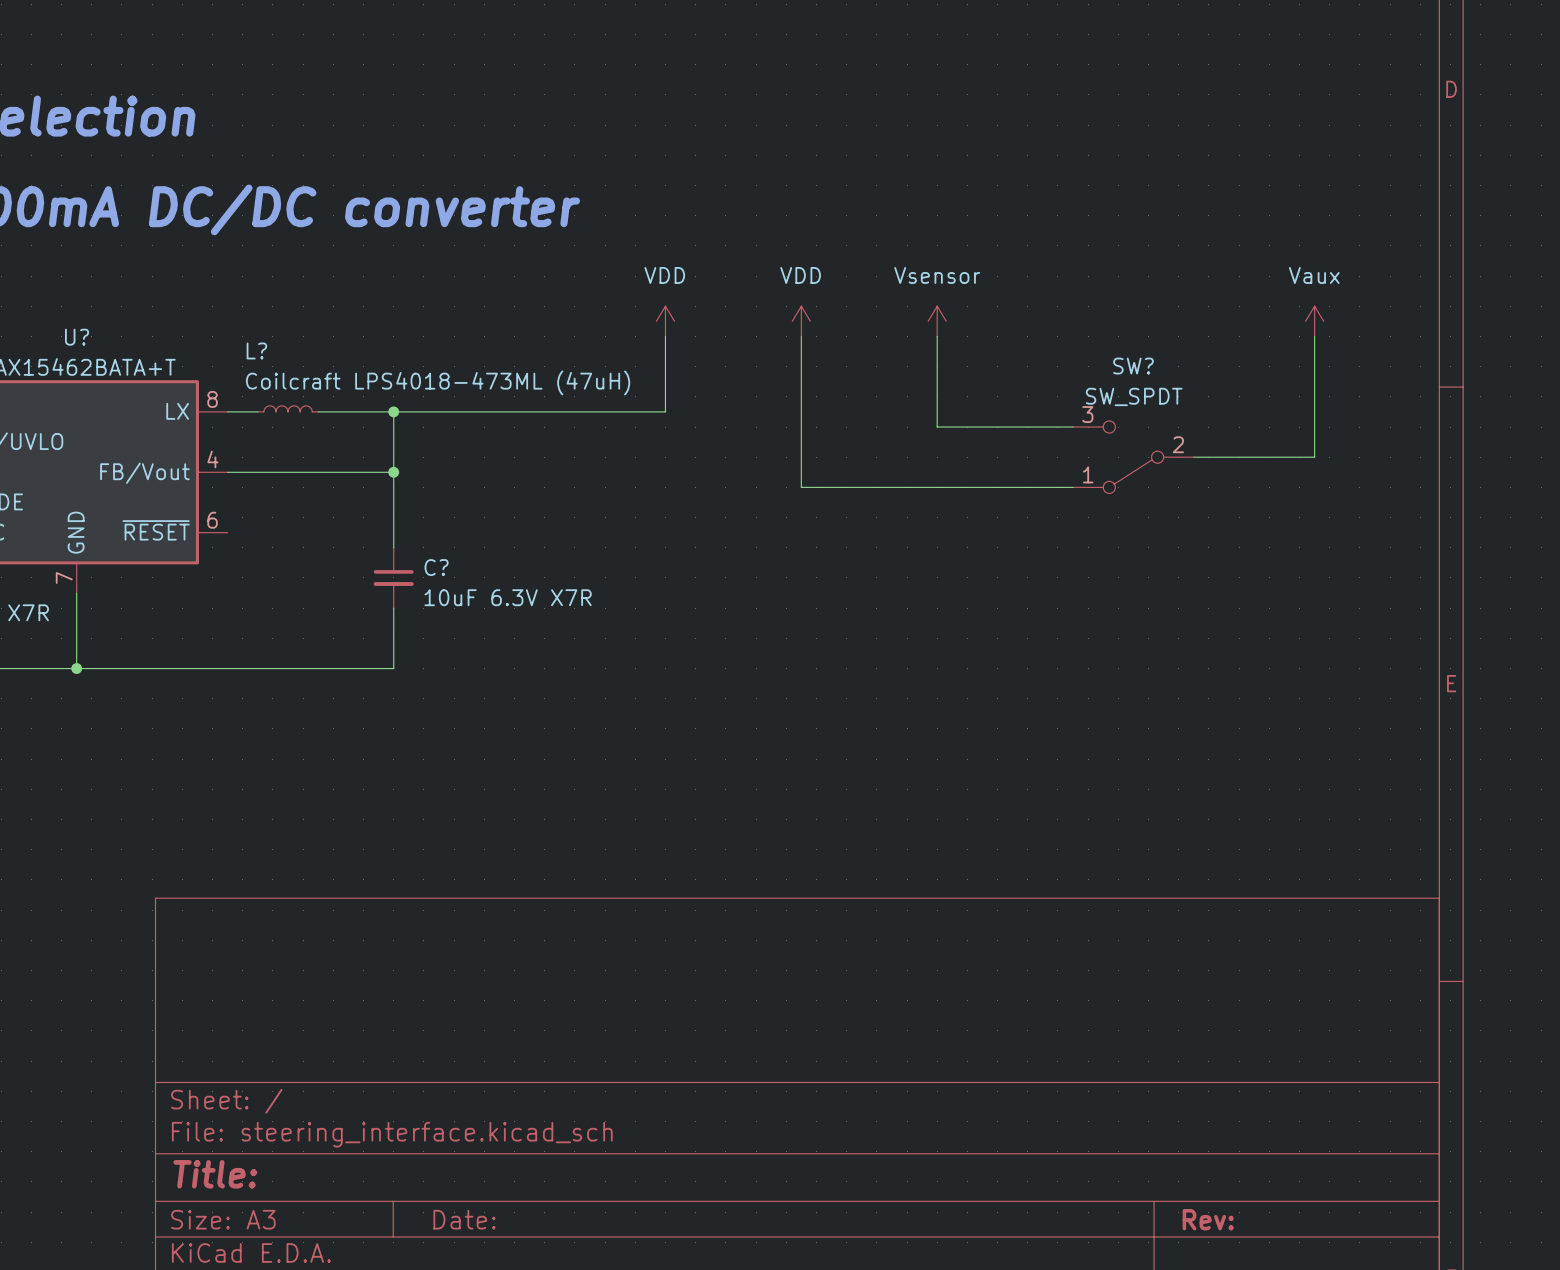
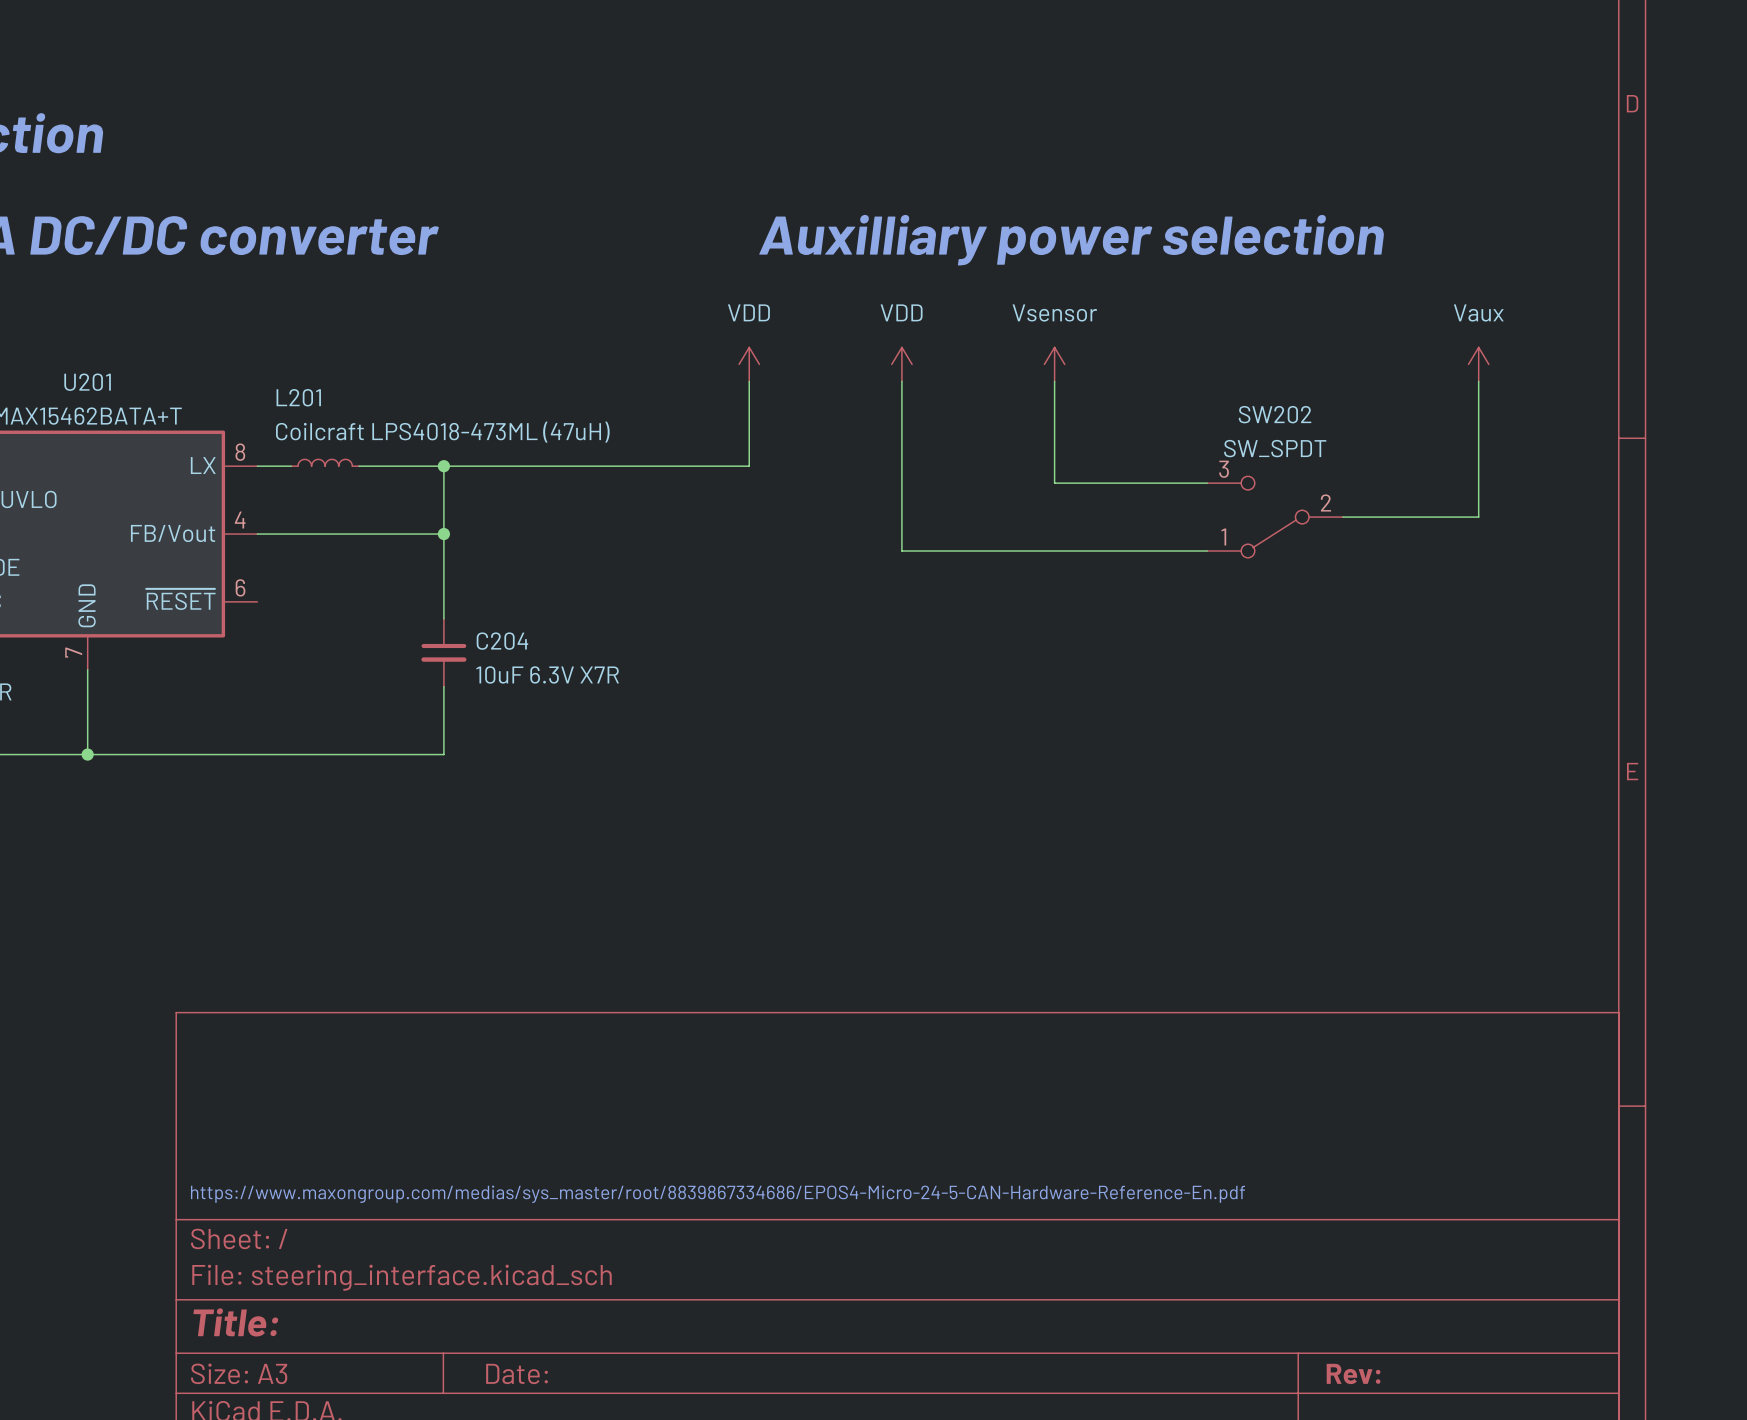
text: none -> Auxilliary power selection (1071, 240)
U? name: U? (77, 337) -> U201 (87, 382)
L? name: L? (256, 350) -> L201 (298, 397)
SW? name: SW? (1133, 366) -> SW202 (1275, 414)
C? name: C? (436, 567) -> C204 (502, 641)
text: none -> https://www.maxongroup.com/medias/sys_master/root/8839867334686/EPOS4-Micro-24-5-CAN-Hardware-Reference-En.pdf (718, 1194)

